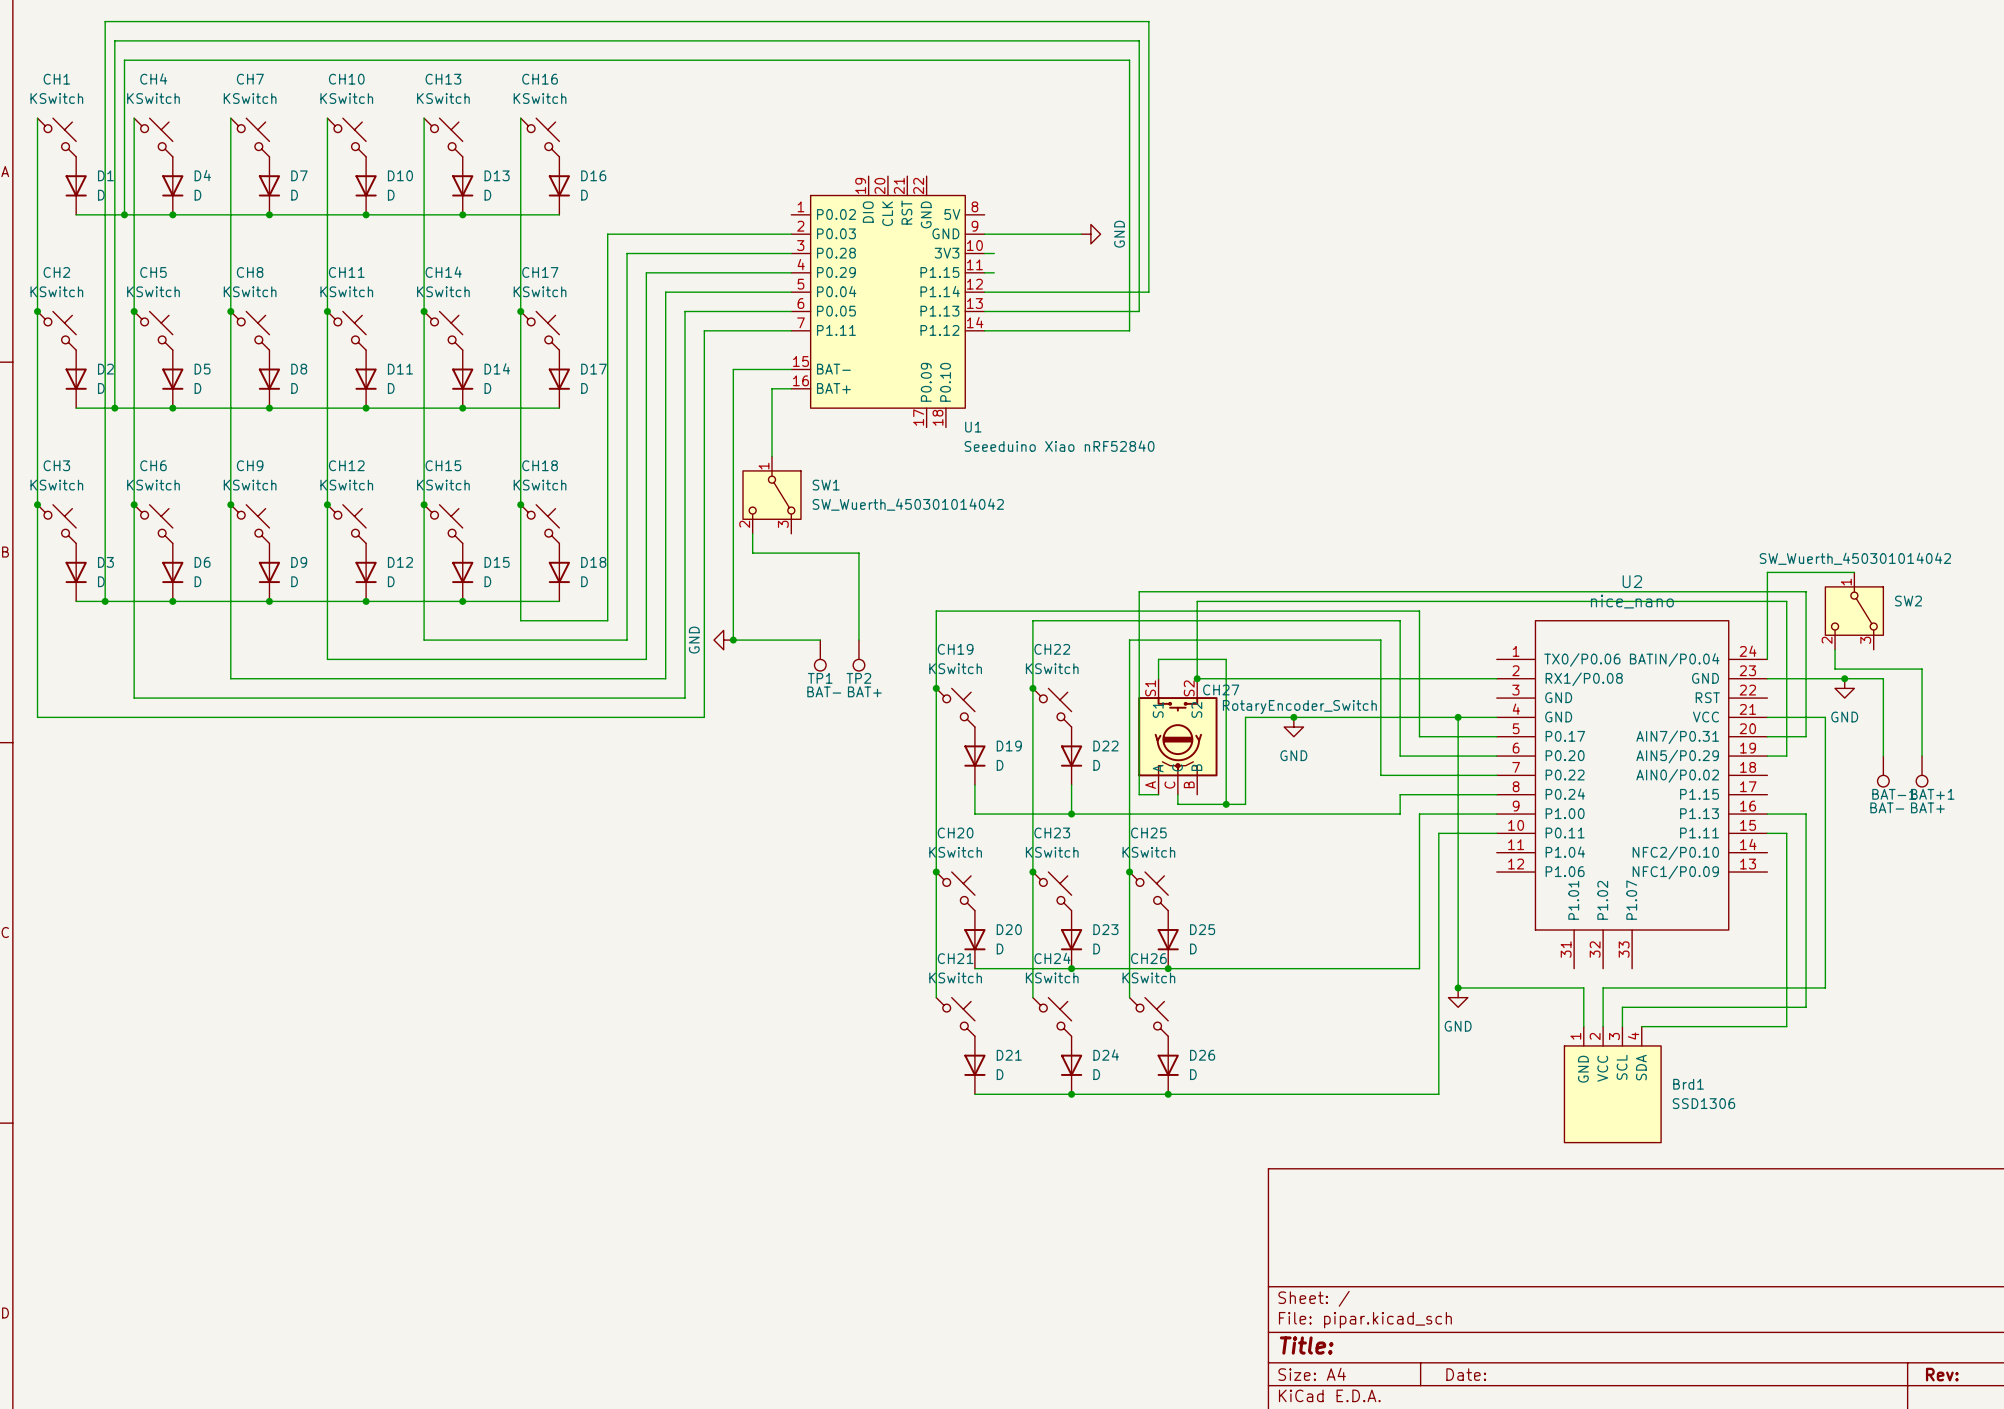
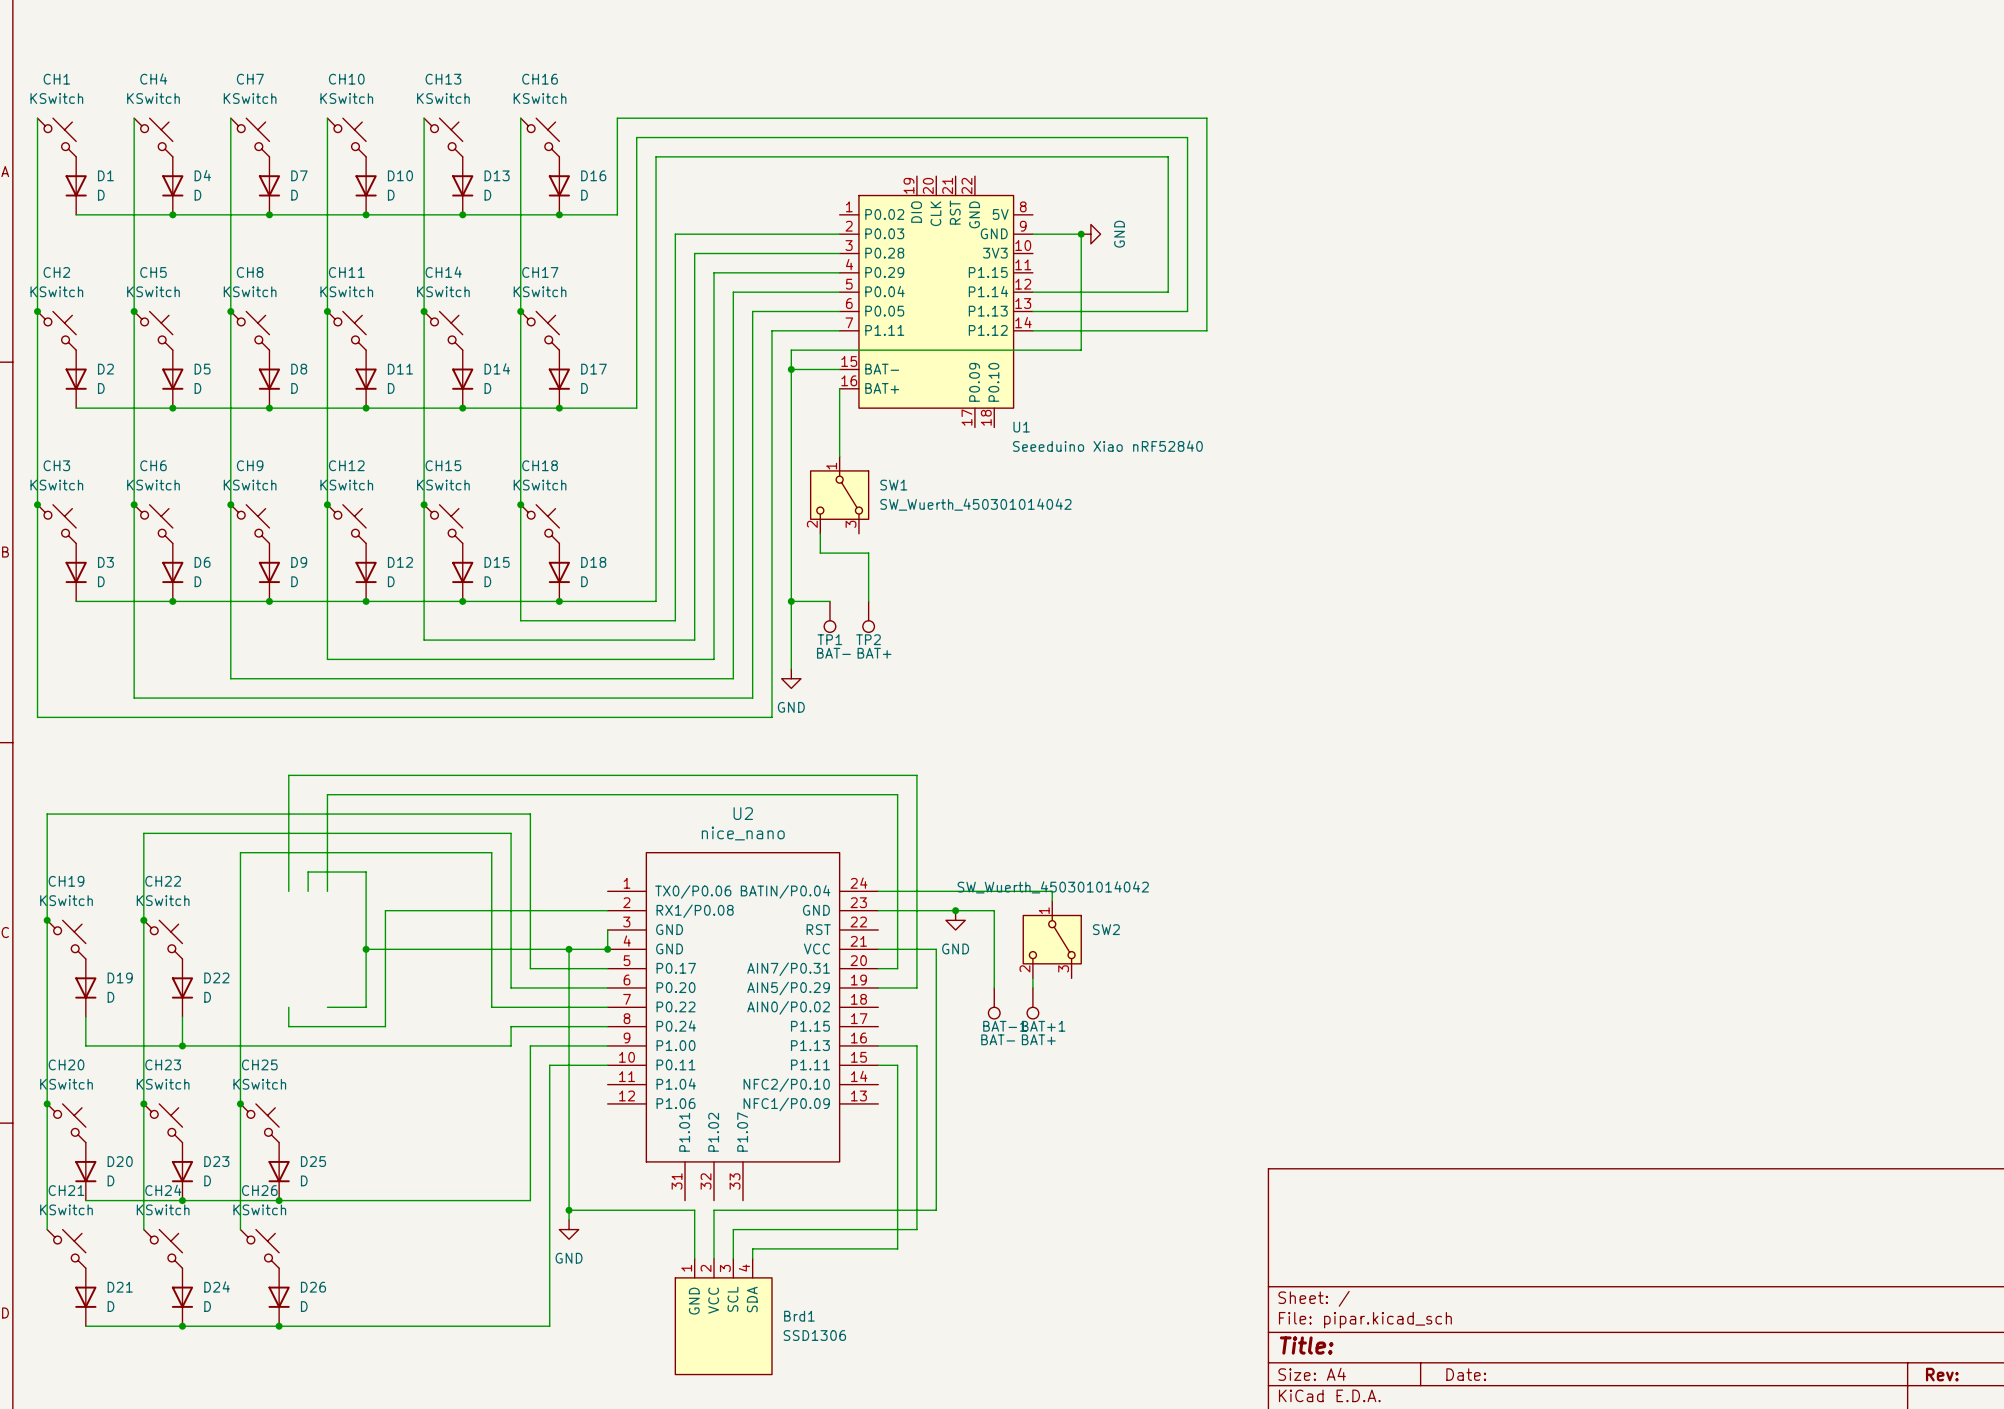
wire: (124, 214) (124, 60) (1129, 60) (1129, 330) -> (559, 214) (617, 214) (617, 118) (1206, 118) (1206, 330) (1129, 330)
junction: (124, 214) -> none
junction: none -> (559, 214)
wire: (675, 234) (607, 234) (607, 620) -> (675, 234) (675, 620) (607, 620)
wire: none -> (1081, 234) (1081, 350) (791, 350) (791, 669)
junction: none -> (1081, 234)
wire: (694, 253) (627, 253) (627, 640) -> (694, 253) (694, 640) (627, 640)
wire: (714, 272) (646, 272) (646, 659) -> (714, 272) (714, 659) (646, 659)
wire: (733, 292) (665, 292) (665, 678) -> none
wire: (1148, 292) (1148, 21) (105, 21) (105, 601) -> (1148, 292) (1168, 292) (1168, 156) (656, 156) (656, 601) (559, 601)
U1 position: (887, 301) -> (936, 301)
wire: (752, 311) (685, 311) (685, 698) -> (752, 311) (752, 533)
wire: (1139, 311) (1139, 40) (114, 40) (114, 408) -> (1139, 311) (1187, 311) (1187, 137) (636, 137) (636, 408) (559, 408)
wire: (771, 330) (704, 330) (704, 717) -> (771, 456) (771, 717) (704, 717)
wire: (733, 369) (791, 369) -> (733, 369) (733, 292)
junction: none -> (791, 369)
wire: (771, 388) (791, 388) -> (771, 388) (771, 330)
wire: none -> (839, 388) (839, 456)
junction: (114, 408) -> none
junction: none -> (559, 408)
SW1 position: (771, 495) -> (839, 495)
wire: (752, 553) (820, 553) -> (820, 533) (820, 553)
wire: none -> (752, 553) (752, 698) (685, 698)
wire: (858, 553) (858, 640) -> (858, 553) (868, 553) (868, 601)
wire: (1854, 572) (1767, 572) (1767, 659) -> none
junction: (105, 601) -> none
junction: none -> (559, 601)
wire: none -> (791, 601) (829, 601)
junction: none -> (791, 601)
SW2 position: (1854, 611) -> (1052, 939)
power symbol rotation: 0° (723, 640) -> 90° counterclockwise (791, 678)
power symbol position: GND (723, 640) -> GND (791, 678)
wire: (733, 640) (820, 640) -> (733, 640) (733, 678) (665, 678)
junction: (733, 640) -> none
wire: (1835, 649) (1835, 669) (1922, 669) (1922, 756) -> none
TP1 position: (820, 655) -> (829, 616)
TP2 position: (858, 655) -> (868, 616)
wire: (1158, 678) (1158, 659) (1226, 659) (1226, 804) -> none
junction: (1197, 678) -> none
wire: (1496, 678) (1197, 678) (1197, 601) (1786, 601) (1786, 756) (1767, 756) -> none
wire: (1767, 678) (1883, 678) (1883, 756) -> none
junction: (1844, 678) -> none
junction: (936, 688) -> none
junction: (1032, 688) -> none
power symbol: GND (1844, 688) -> none
CH19 position: (955, 707) -> (66, 939)
CH22 position: (1052, 707) -> (163, 939)
junction: (1293, 717) -> none
wire: (1458, 717) (1458, 987) (1583, 987) (1583, 1026) -> none
junction: (1458, 717) -> none
wire: (1496, 717) (1245, 717) (1245, 804) (1177, 804) (1177, 794) -> none
wire: (1767, 717) (1825, 717) (1825, 987) (1603, 987) (1603, 1026) -> none
power symbol: GND (1293, 727) -> none
CH27: RotaryEncoder_Switch (1177, 736) -> none
wire: (1496, 736) (1419, 736) (1419, 611) (936, 611) (936, 949) -> (878, 949) (936, 949)
wire: (1767, 736) (1806, 736) (1806, 591) (1139, 591) (1139, 794) (1158, 794) -> none
D19 position: (974, 756) -> (85, 987)
D22 position: (1071, 756) -> (182, 987)
wire: (1496, 756) (1400, 756) (1400, 620) (1032, 620) (1032, 978) -> none
BAT-1 position: (1883, 771) -> (994, 1003)
BAT+1 position: (1922, 771) -> (1032, 1003)
wire: (1496, 775) (1380, 775) (1380, 640) (1129, 640) (1129, 997) -> none
wire: (974, 785) (974, 814) (1400, 814) (1400, 794) (1496, 794) -> none
wire: (1071, 785) (1071, 814) -> none
U2 position: (1632, 794) -> (742, 1026)
junction: (1226, 804) -> none
junction: (1071, 814) -> none
wire: (1496, 814) (1419, 814) (1419, 968) (974, 968) -> none
wire: (1767, 814) (1806, 814) (1806, 1007) (1622, 1007) (1622, 1026) -> none
wire: (1496, 833) (1438, 833) (1438, 1094) (974, 1094) -> none
wire: (1767, 833) (1786, 833) (1786, 1026) (1641, 1026) -> none
junction: (936, 872) -> none
junction: (1032, 872) -> none
junction: (1129, 872) -> none
wire: none -> (288, 891) (288, 775) (916, 775) (916, 987) (878, 987)
wire: none -> (308, 891) (308, 872) (366, 872) (366, 1007) (327, 1007)
wire: none -> (327, 891) (327, 794) (897, 794) (897, 968) (878, 968)
wire: none -> (878, 891) (1052, 891) (1052, 901)
CH20 position: (955, 891) -> (66, 1123)
CH23 position: (1052, 891) -> (163, 1123)
CH25 position: (1148, 891) -> (259, 1123)
wire: none -> (607, 910) (385, 910) (385, 1026) (288, 1026) (288, 1007)
wire: none -> (878, 910) (994, 910) (994, 987)
junction: none -> (955, 910)
junction: none -> (47, 920)
junction: none -> (143, 920)
power symbol: none -> GND (955, 920)
wire: none -> (607, 929) (607, 949) (366, 949)
D20 position: (974, 939) -> (85, 1171)
D23 position: (1071, 939) -> (182, 1171)
D25 position: (1168, 939) -> (279, 1171)
junction: none -> (366, 949)
wire: none -> (569, 949) (569, 1219)
junction: none -> (569, 949)
junction: none -> (607, 949)
wire: none -> (607, 968) (530, 968) (530, 814) (47, 814) (47, 1229)
junction: (1071, 968) -> none
junction: (1168, 968) -> none
wire: none -> (607, 987) (511, 987) (511, 833) (143, 833) (143, 1229)
junction: (1458, 987) -> none
wire: none -> (936, 997) (936, 1210) (714, 1210) (714, 1258)
power symbol: GND (1458, 997) -> none
wire: none -> (607, 1007) (491, 1007) (491, 852) (240, 852) (240, 1229)
wire: none -> (85, 1016) (85, 1045) (511, 1045) (511, 1026) (607, 1026)
wire: none -> (182, 1016) (182, 1045)
CH21 position: (955, 1016) -> (66, 1248)
CH24 position: (1052, 1016) -> (163, 1248)
CH26 position: (1148, 1016) -> (259, 1248)
junction: none -> (182, 1045)
wire: none -> (607, 1045) (530, 1045) (530, 1200) (85, 1200)
wire: none -> (878, 1045) (916, 1045) (916, 1229) (733, 1229) (733, 1258)
wire: none -> (607, 1065) (549, 1065) (549, 1326) (85, 1326)
wire: none -> (878, 1065) (897, 1065) (897, 1248) (752, 1248) (752, 1258)
D21 position: (974, 1065) -> (85, 1297)
D24 position: (1071, 1065) -> (182, 1297)
D26 position: (1168, 1065) -> (279, 1297)
Brd1 position: (1612, 1084) -> (723, 1316)
junction: (1071, 1094) -> none
junction: (1168, 1094) -> none
junction: none -> (47, 1103)
junction: none -> (143, 1103)
junction: none -> (240, 1103)
junction: none -> (182, 1200)
junction: none -> (279, 1200)
wire: none -> (569, 1210) (694, 1210) (694, 1258)
junction: none -> (569, 1210)
power symbol: none -> GND (569, 1229)
junction: none -> (182, 1326)
junction: none -> (279, 1326)

